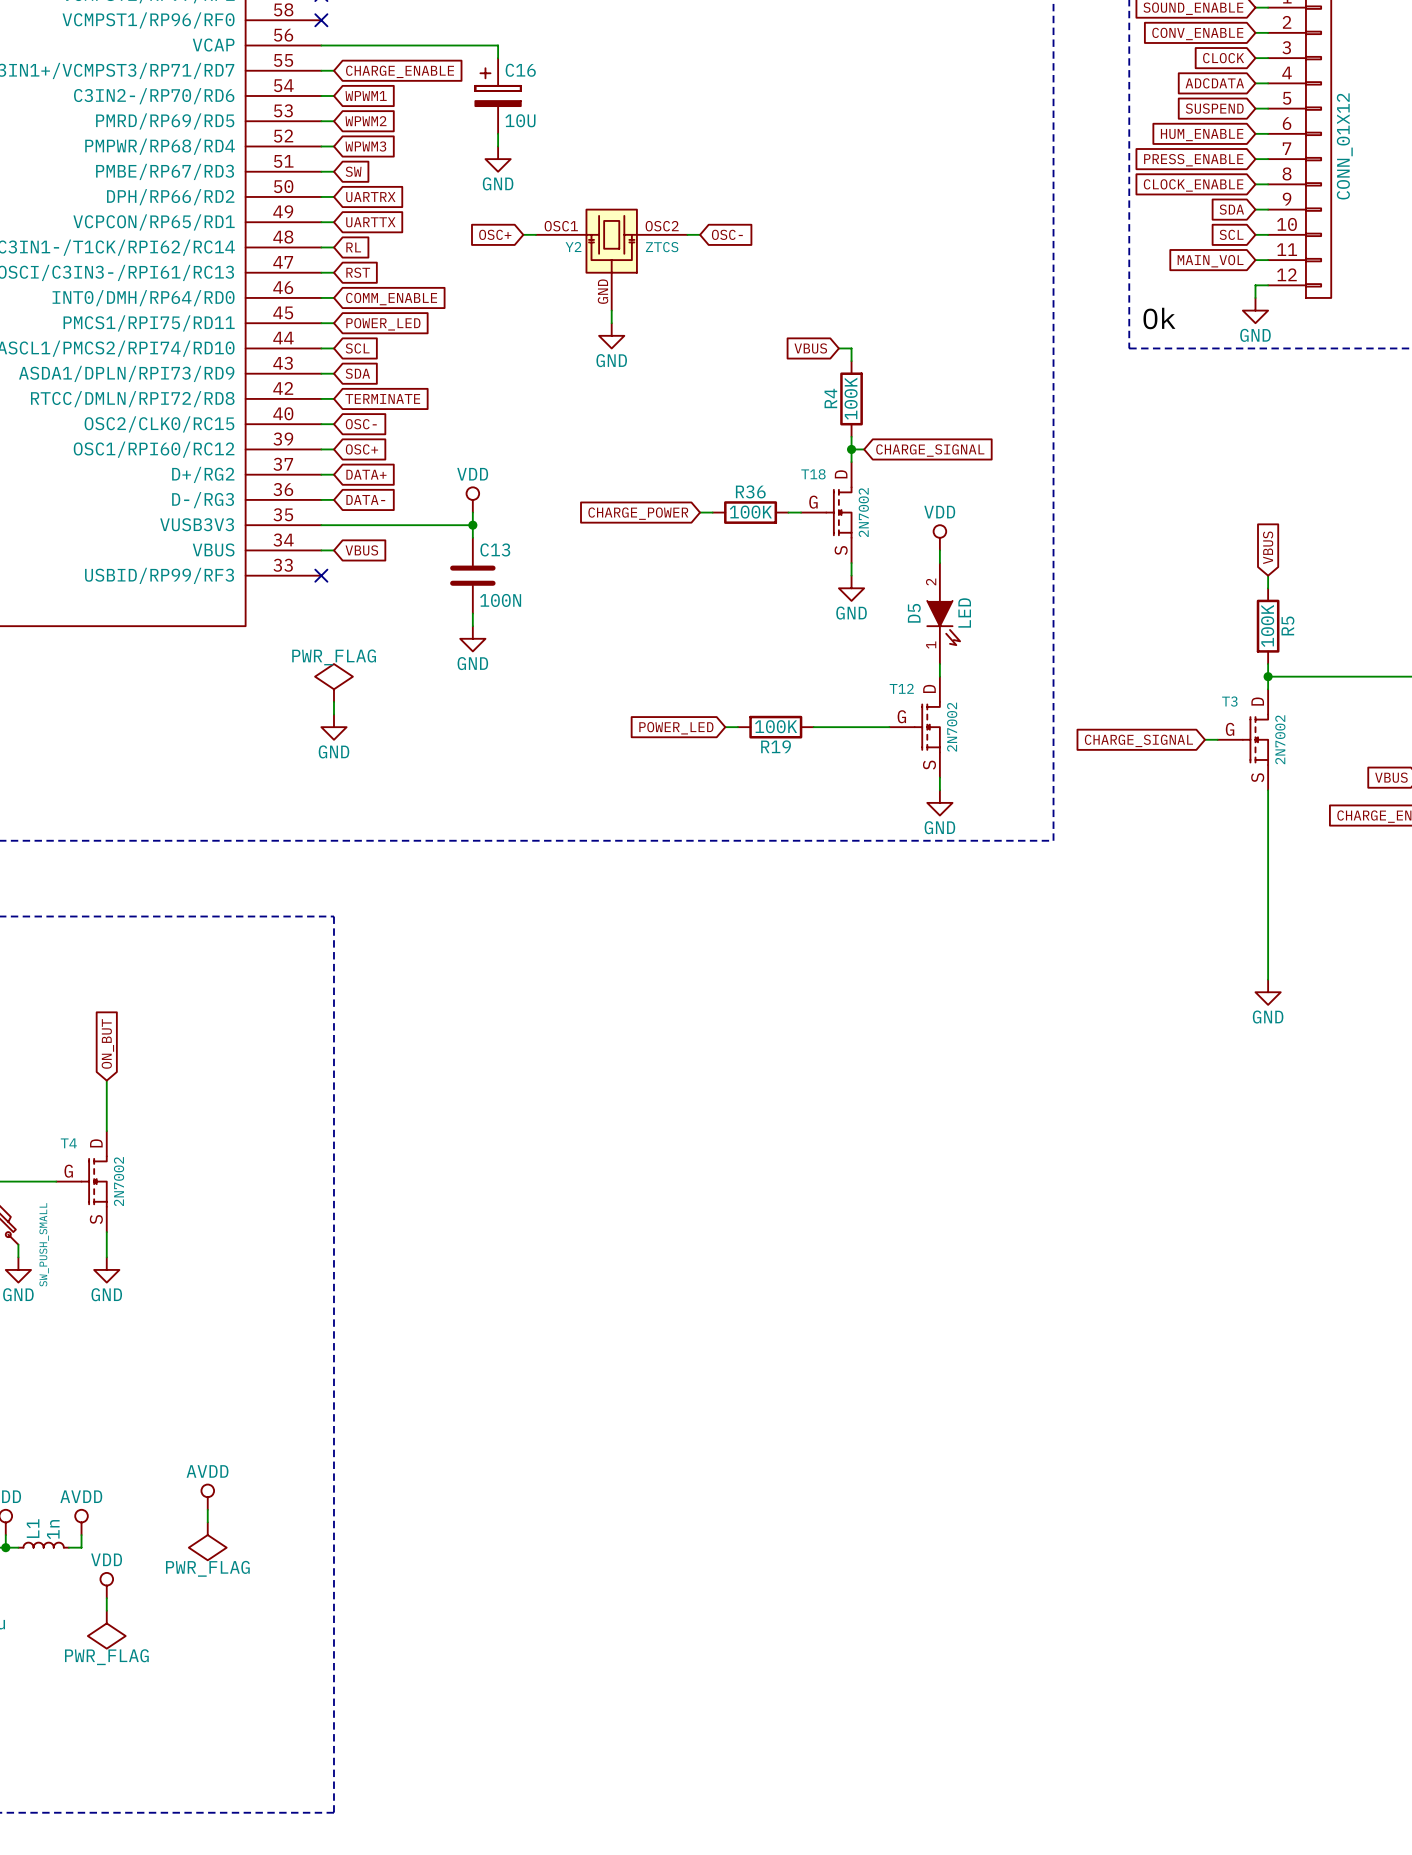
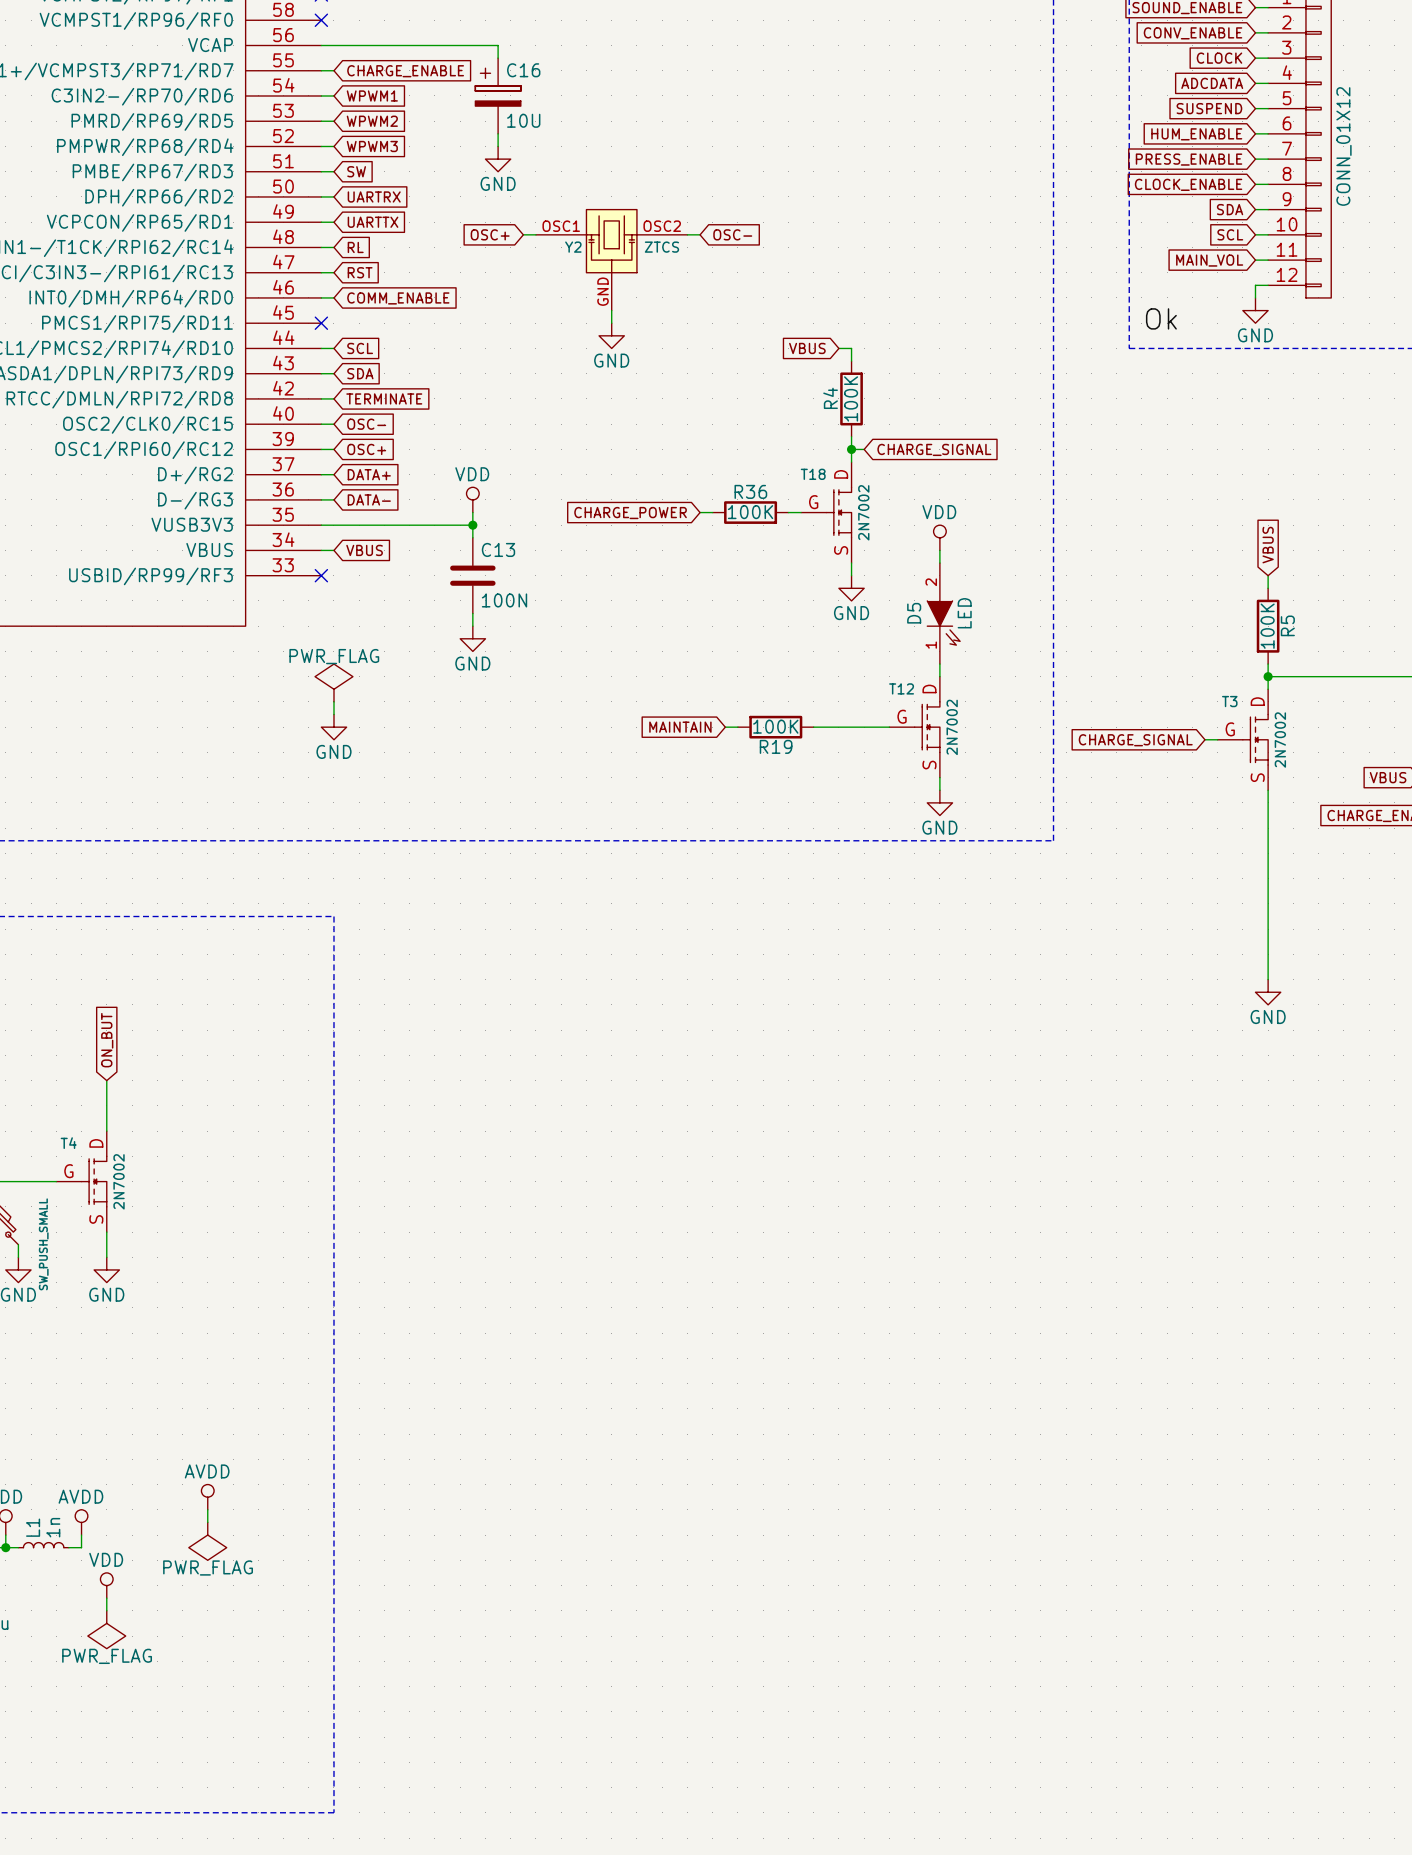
wire: (321, 323) (333, 323) -> none
no-connect mark: none -> (321, 323)
global label: POWER_LED (383, 324) -> none
global label: POWER_LED (676, 728) -> MAINTAIN (680, 727)

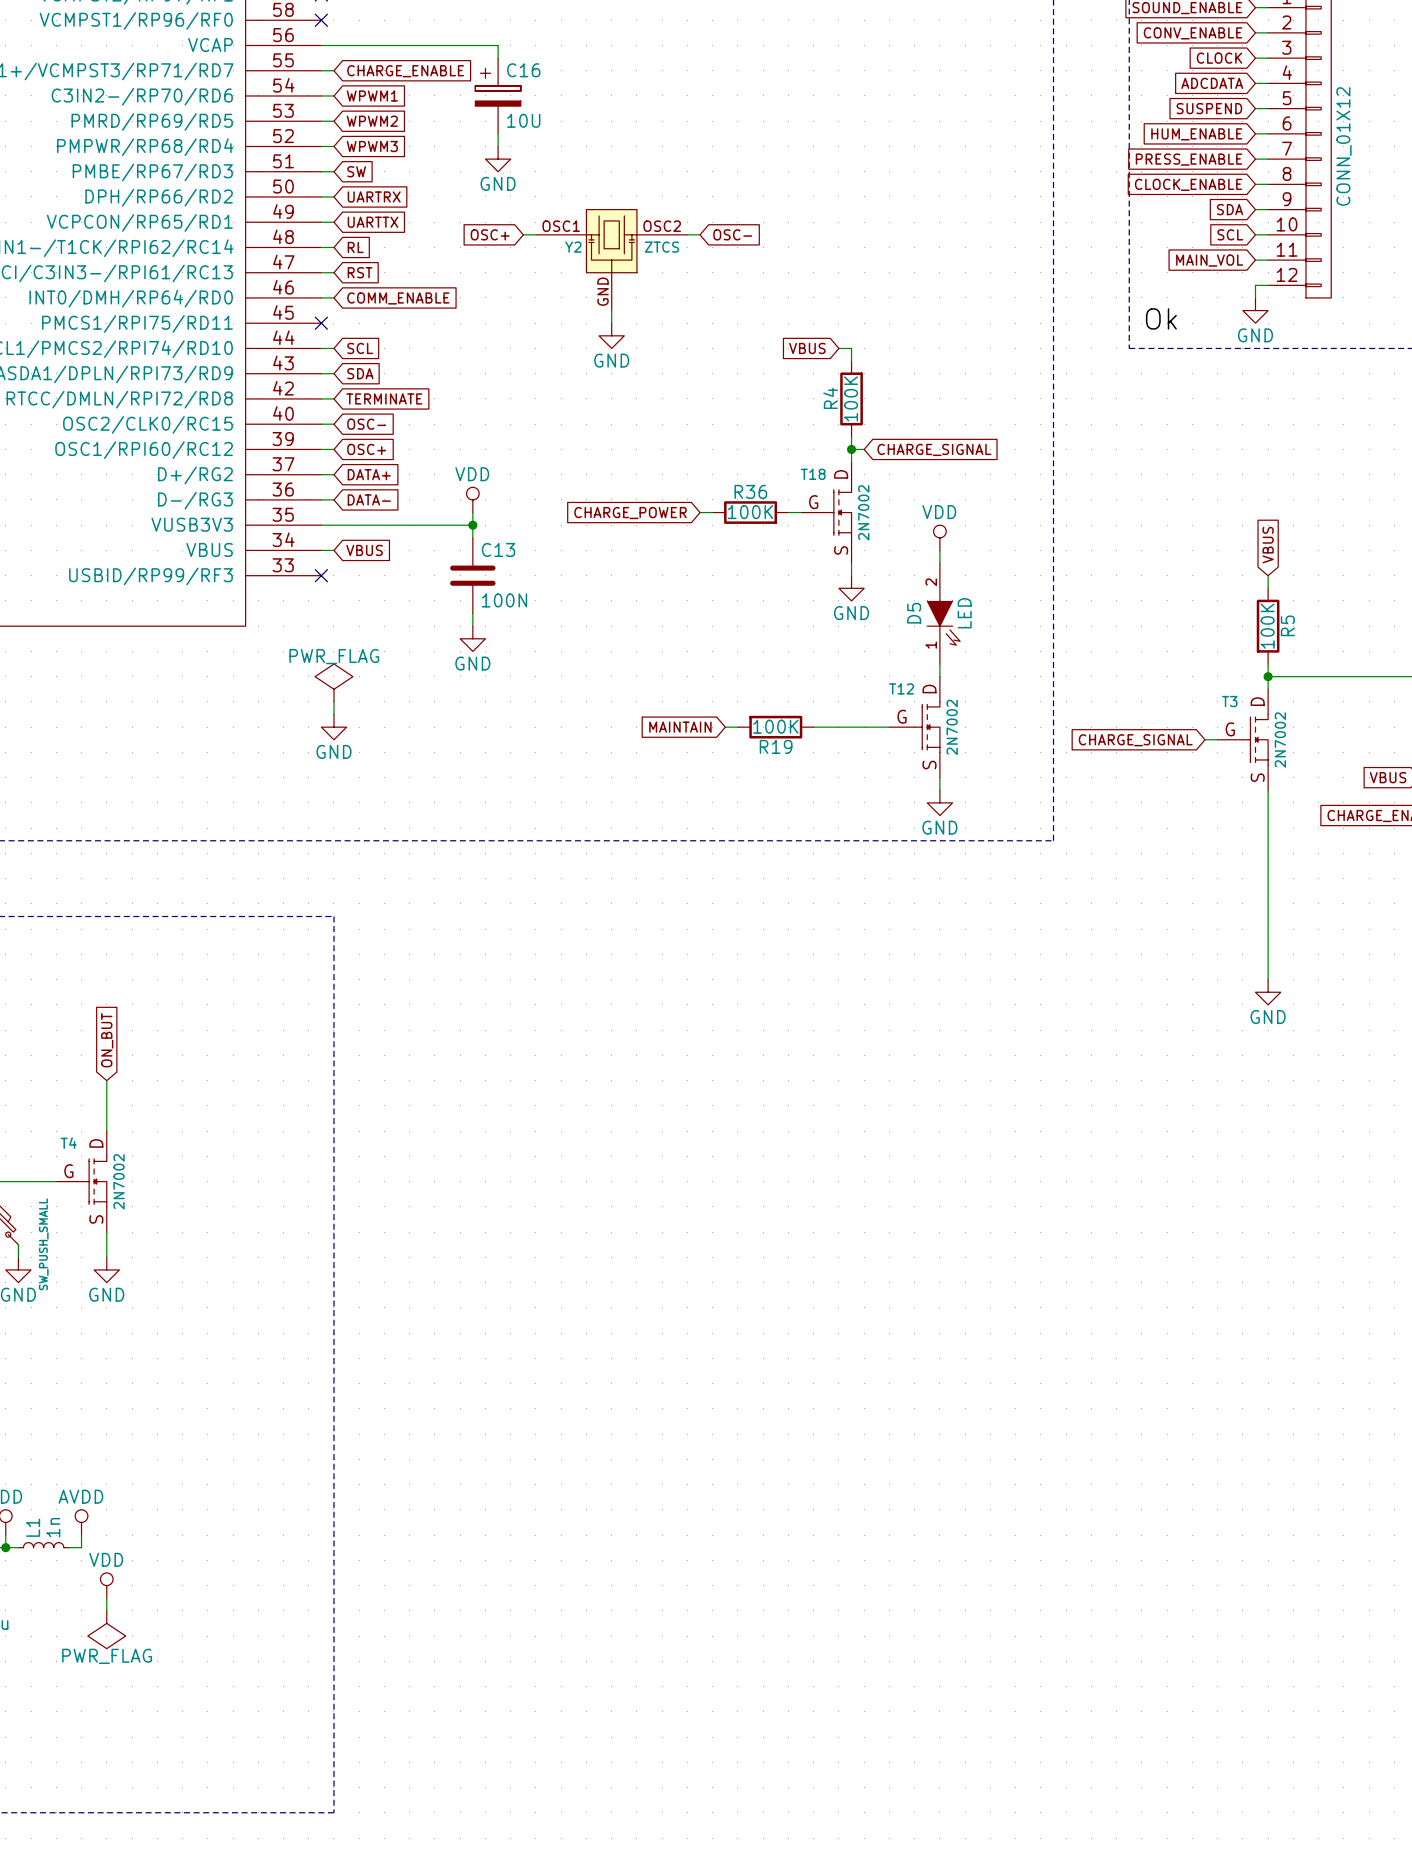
power symbol: AVDD (207, 1497) -> none
wire: (207, 1509) (207, 1522) -> none
power symbol: PWR_FLAG (207, 1541) -> none

